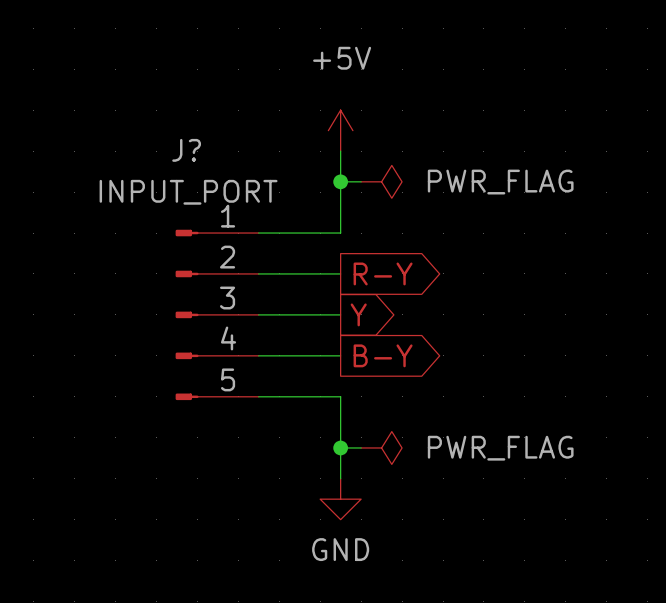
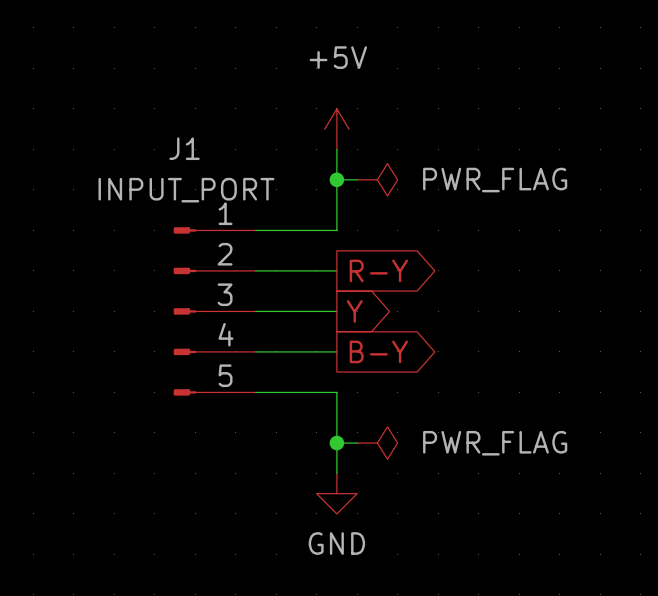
J? name: J? (186, 150) -> J1 (184, 148)

